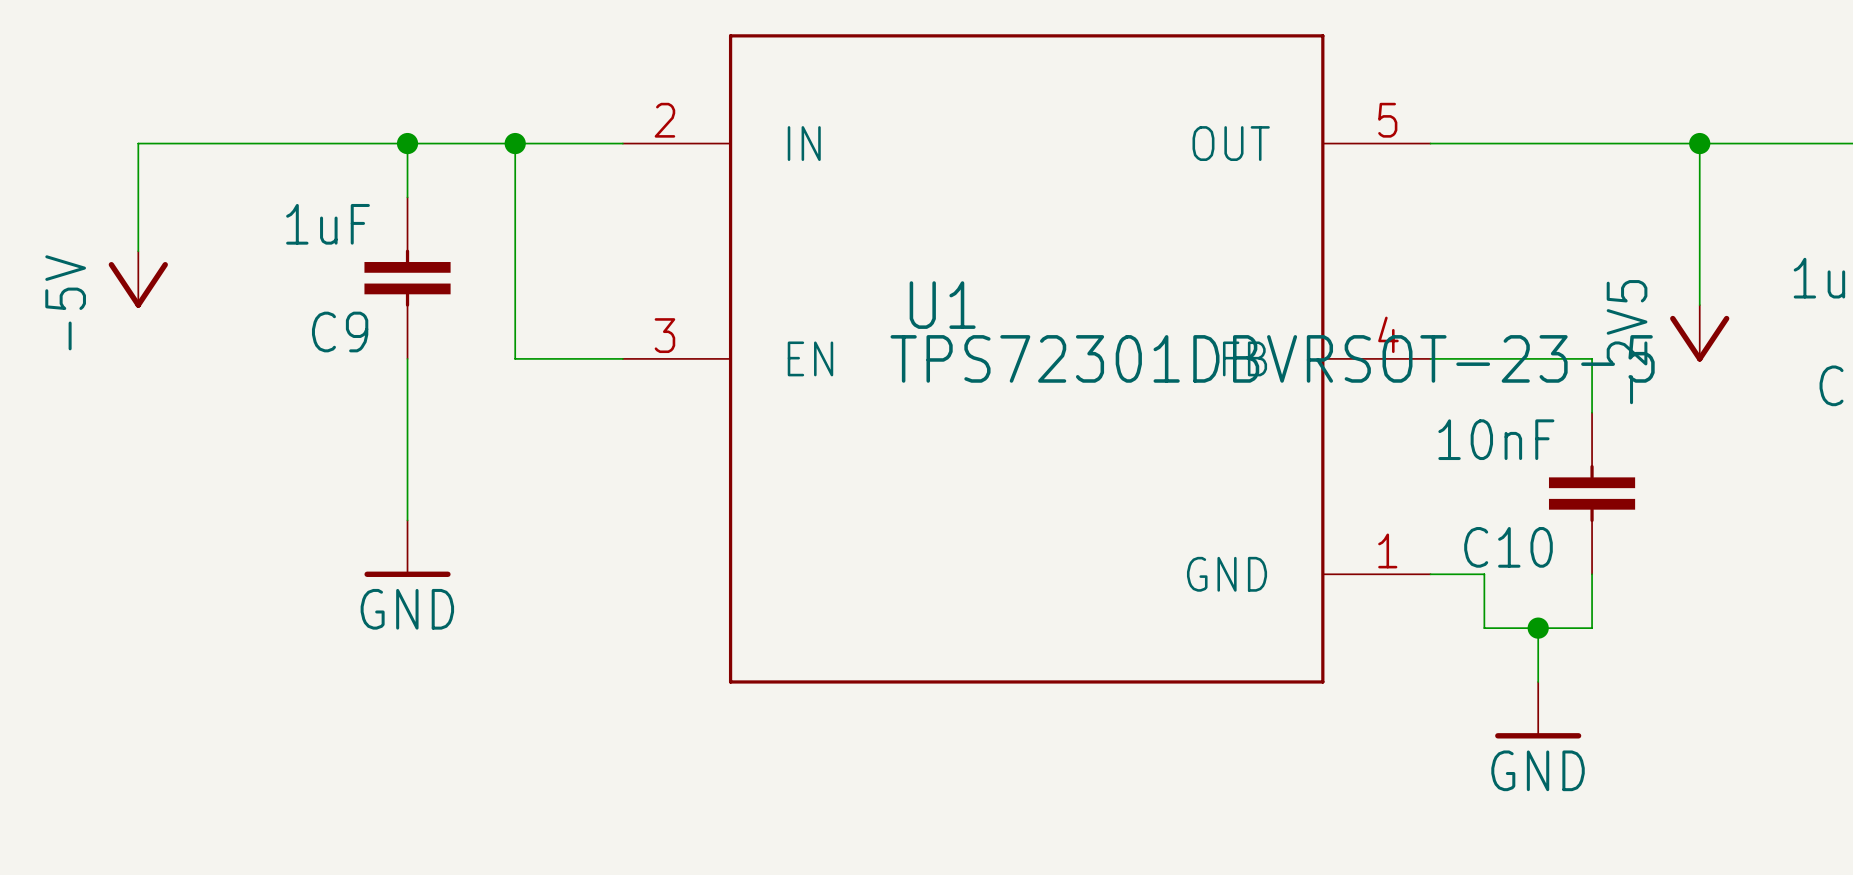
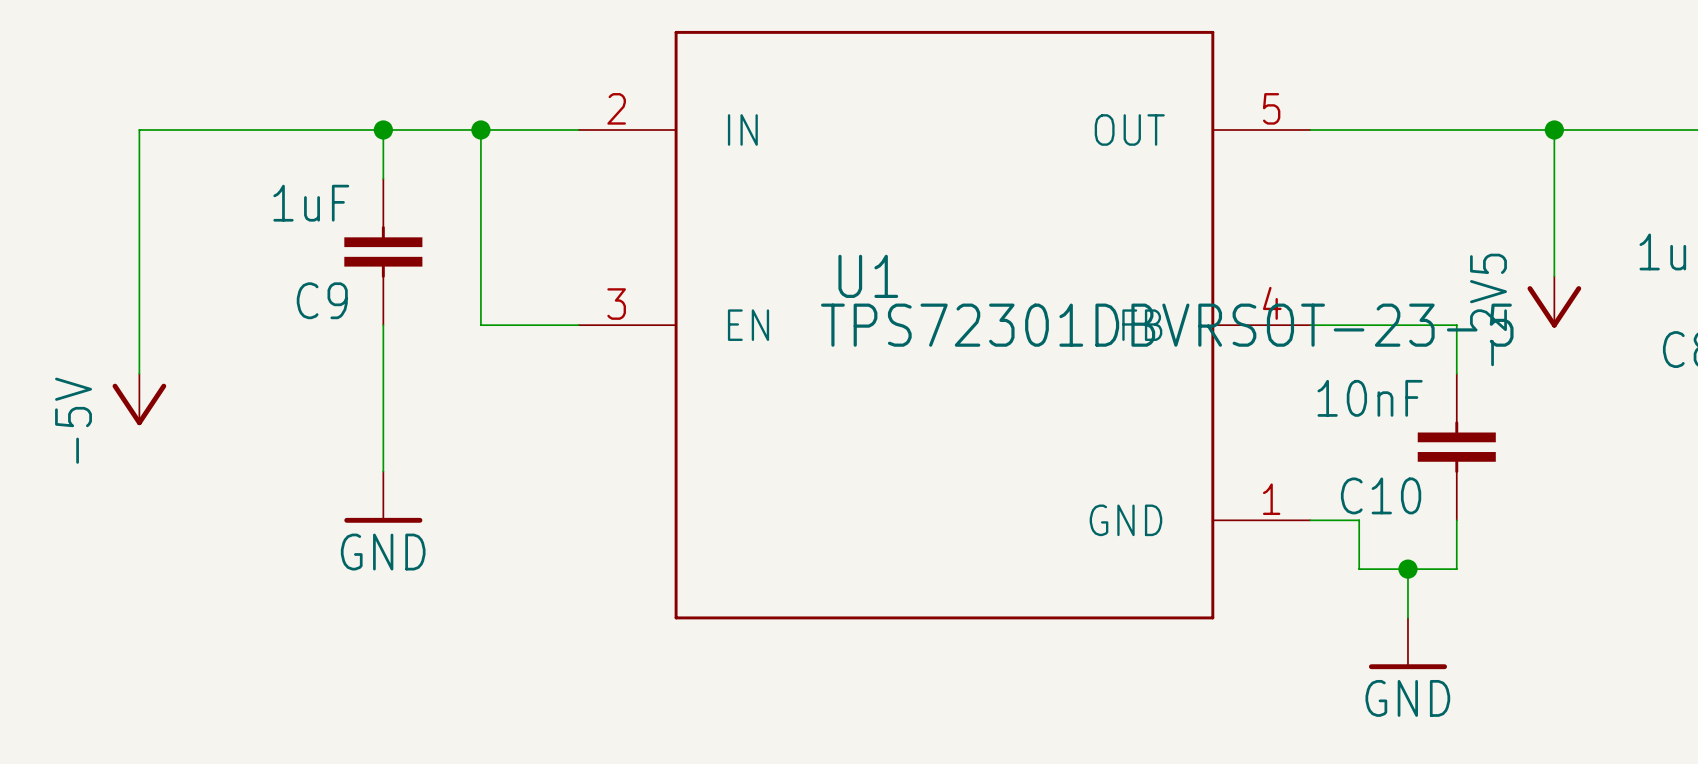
wire: none -> (139, 227) (139, 373)
power symbol position: -5V (138, 279) -> -5V (139, 399)

